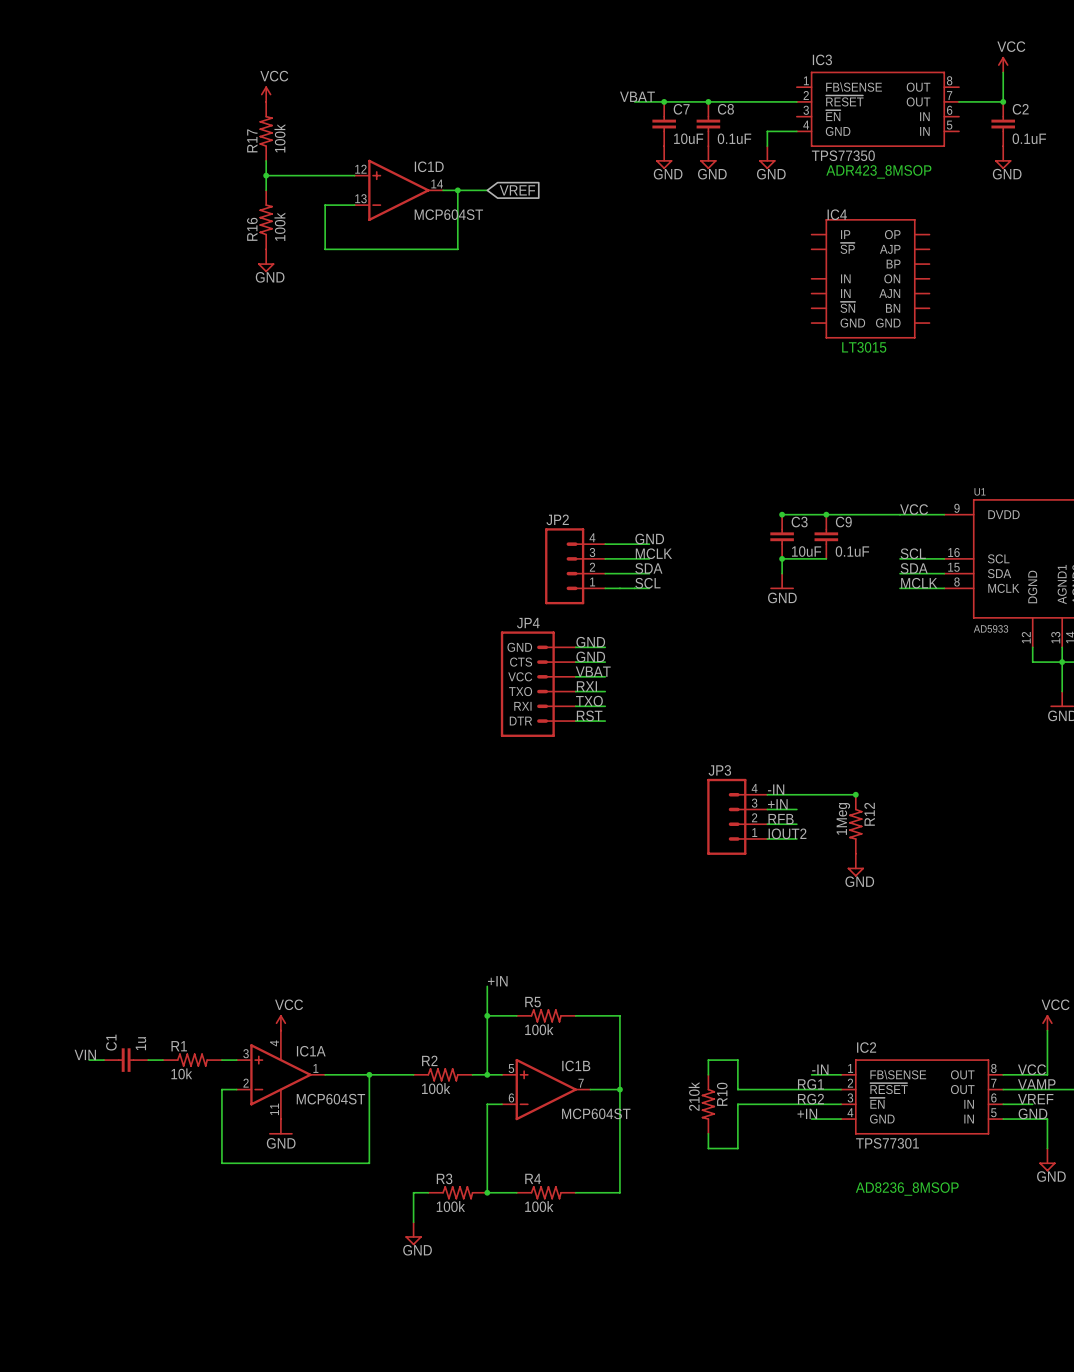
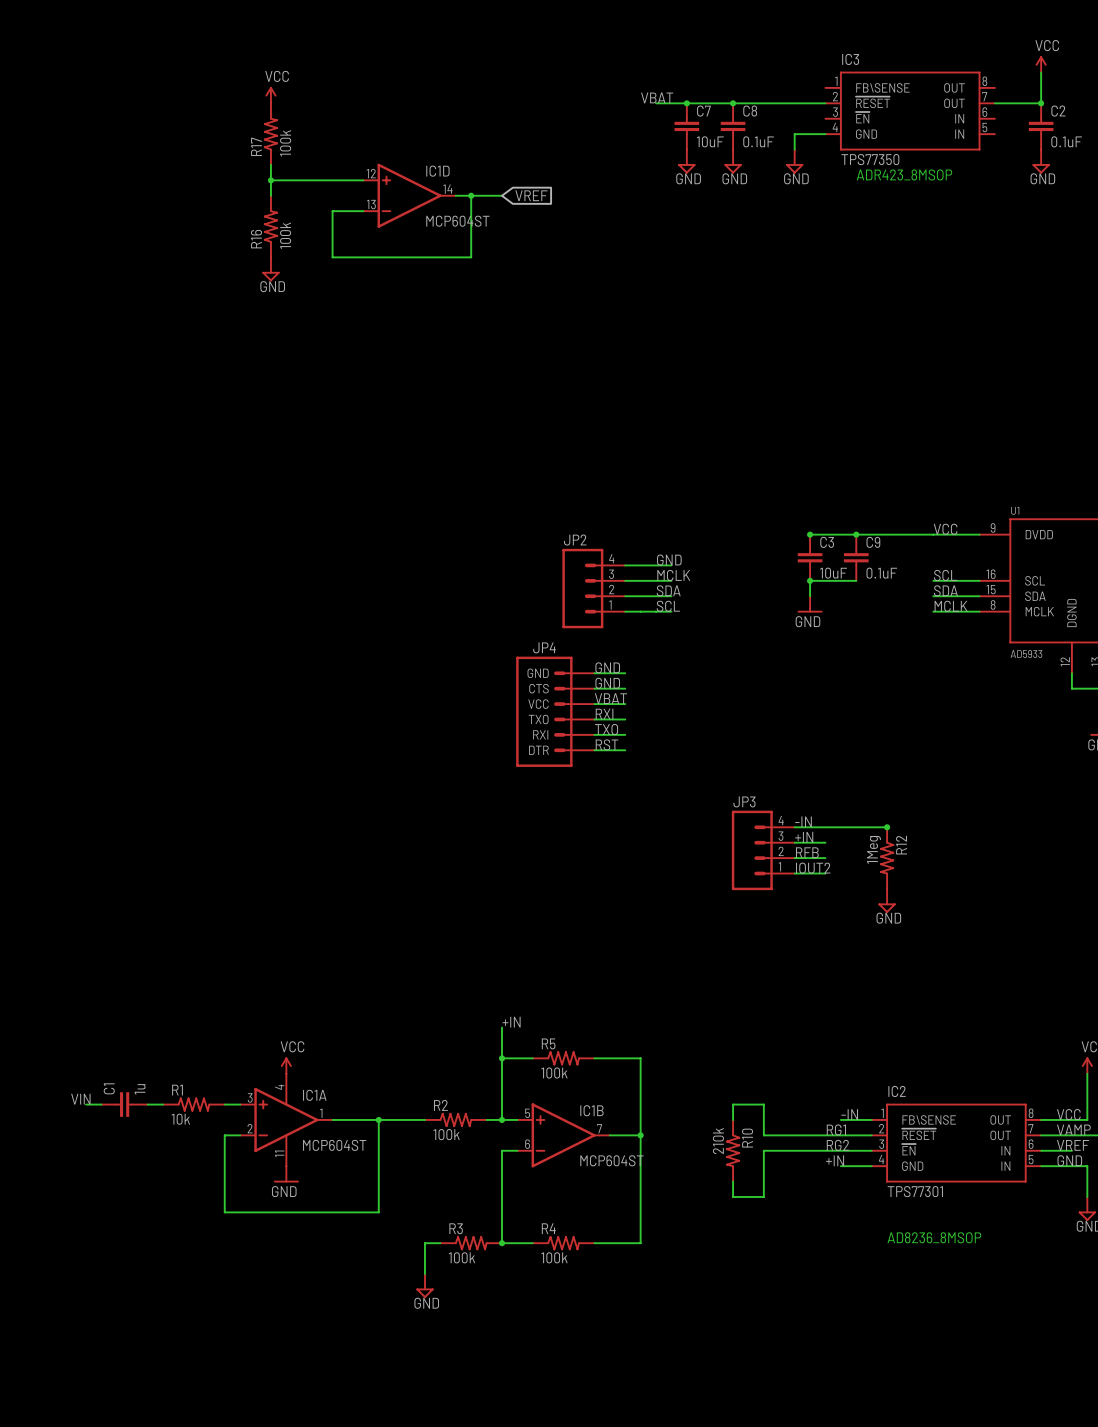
IC4: (870, 278) -> none
text: LT3015 (864, 347) -> none

